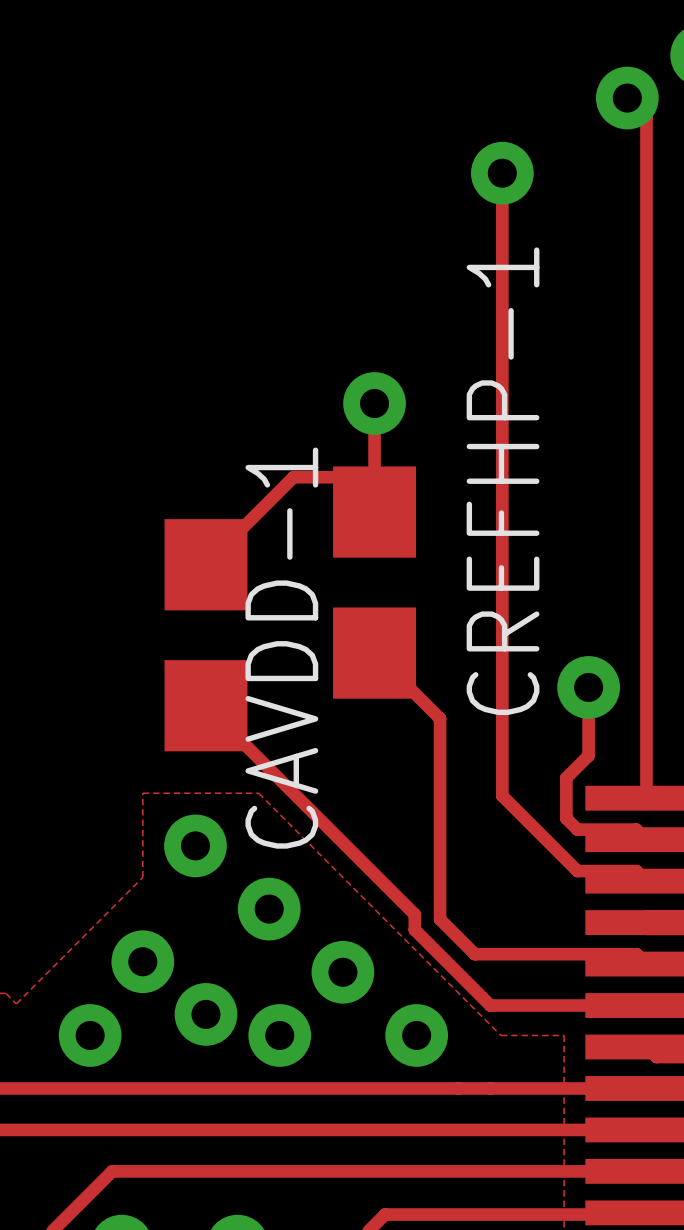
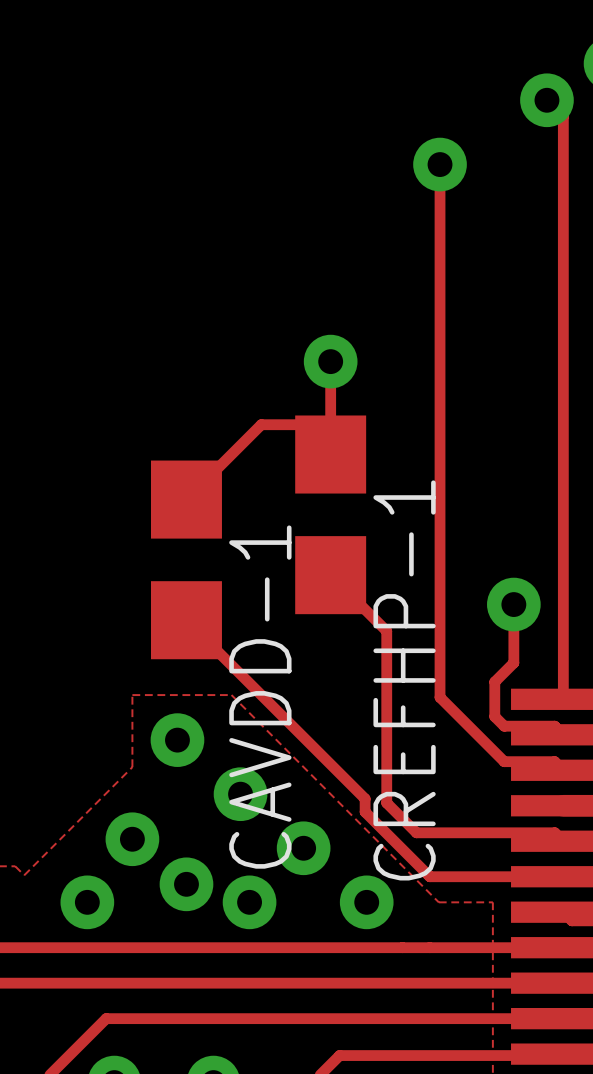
CREFHP-1 name position: CREFHP-1 (503, 481) -> CREFHP-1 (404, 680)
CAVDD-1 name position: CAVDD-1 (281, 648) -> CAVDD-1 (260, 697)

